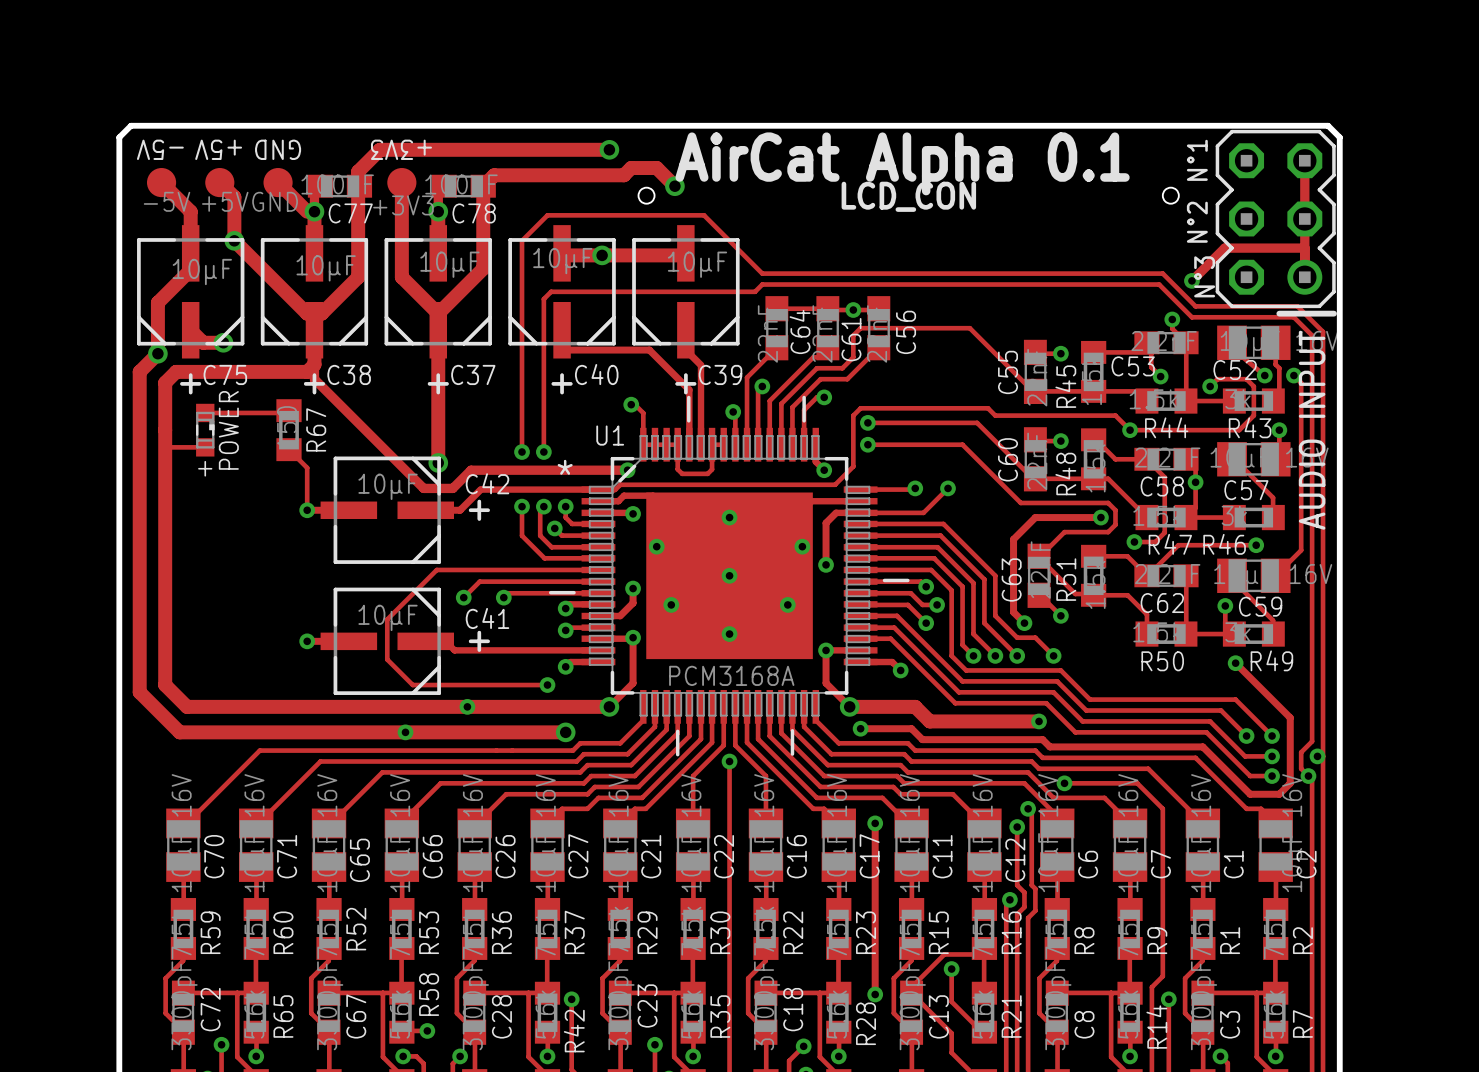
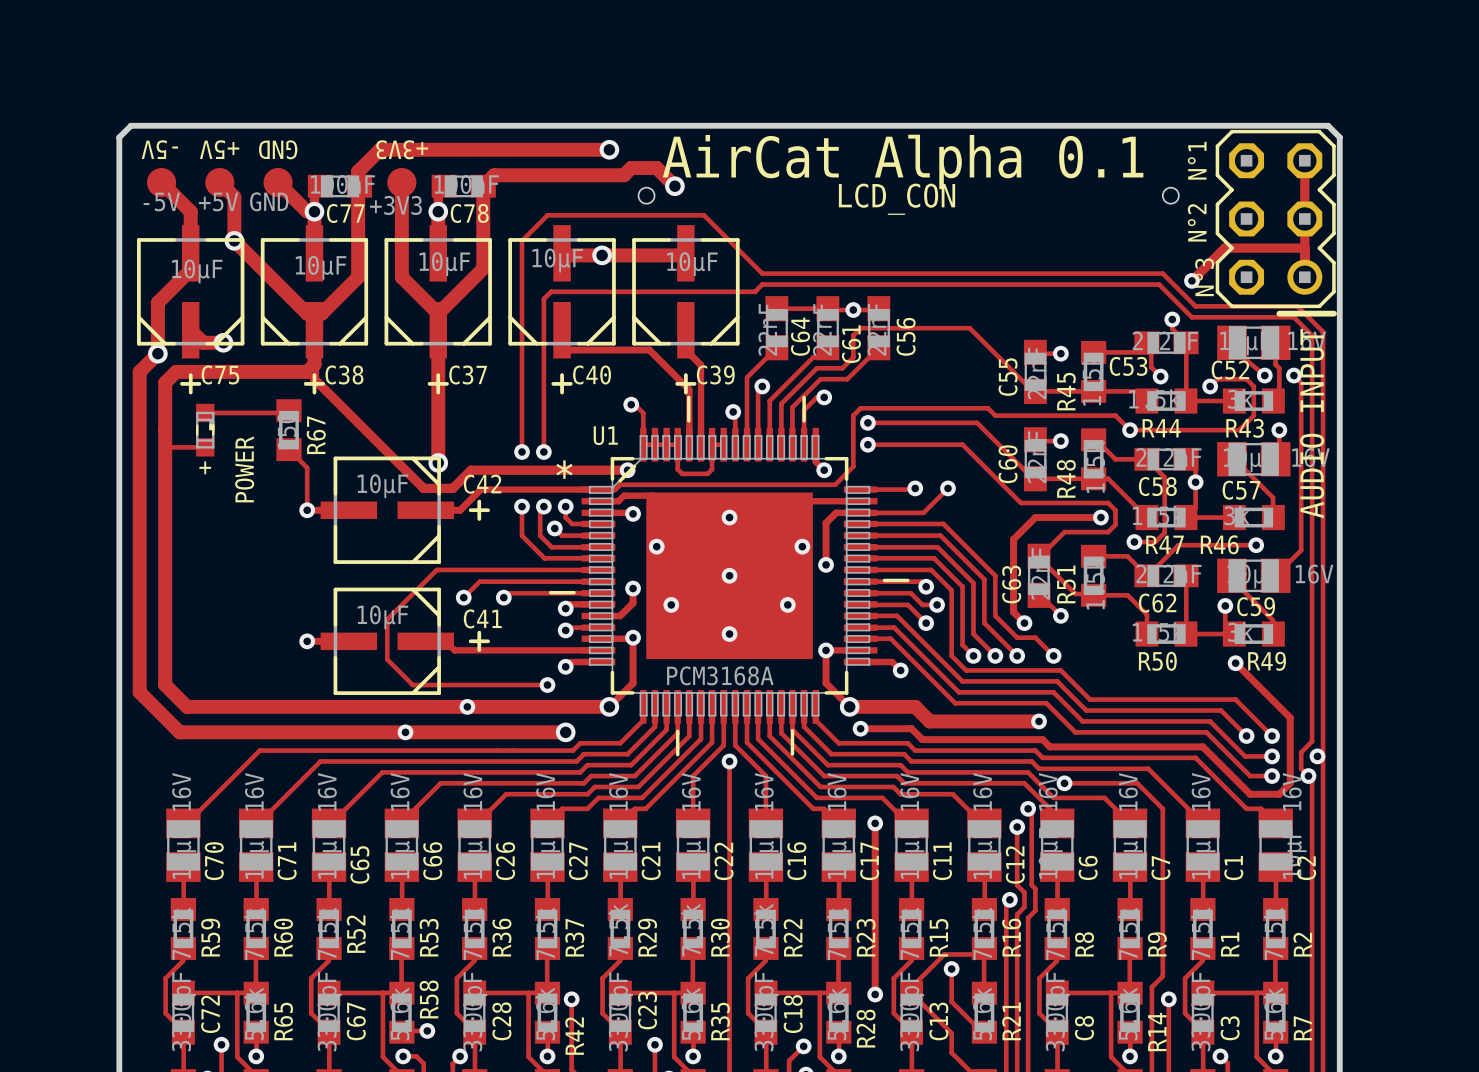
POWER name position: POWER (228, 430) -> POWER (244, 469)

